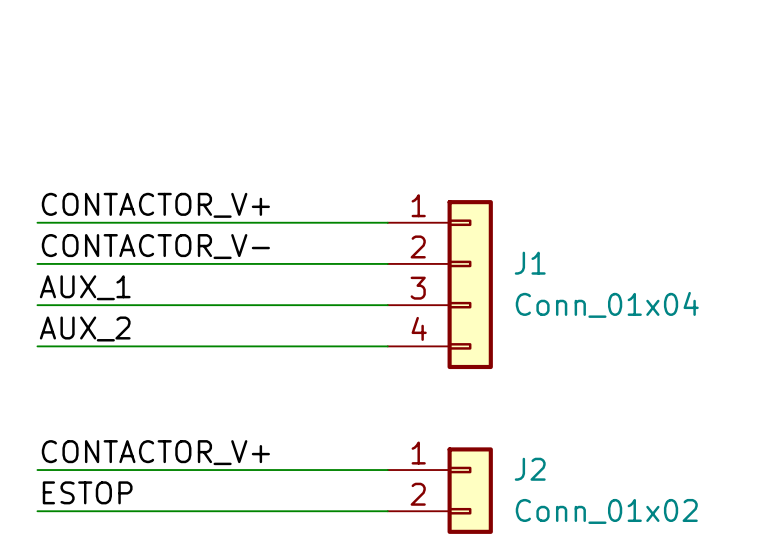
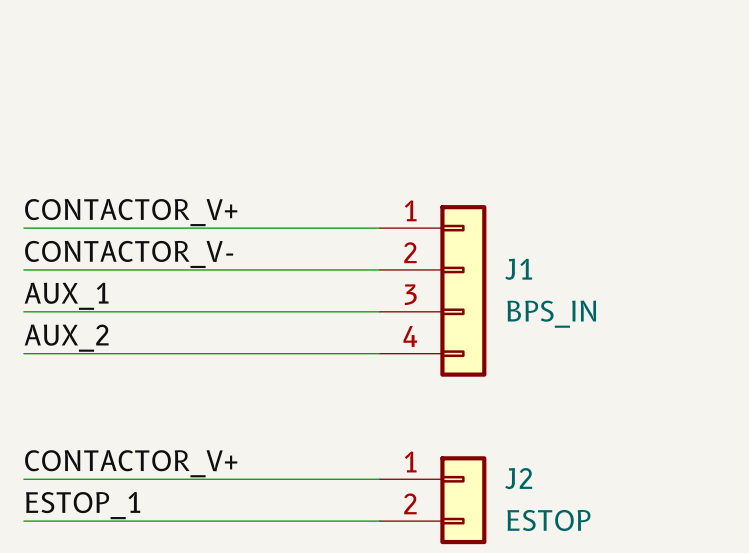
J1 value: Conn_01x04 (607, 304) -> BPS_IN (551, 314)
label: ESTOP (87, 492) -> ESTOP_1 (83, 505)
J2 value: Conn_01x02 (606, 511) -> ESTOP (548, 520)

